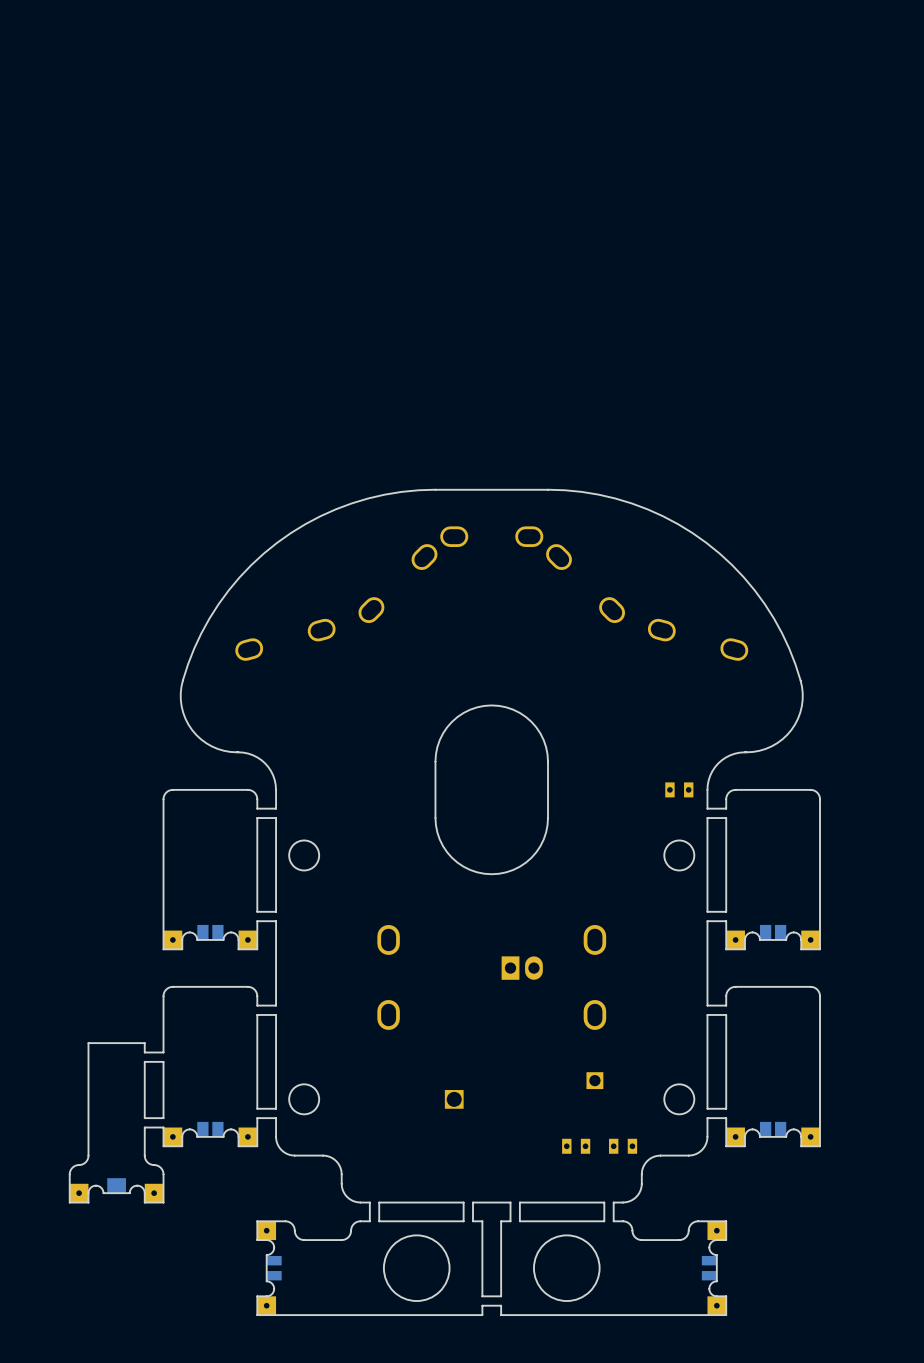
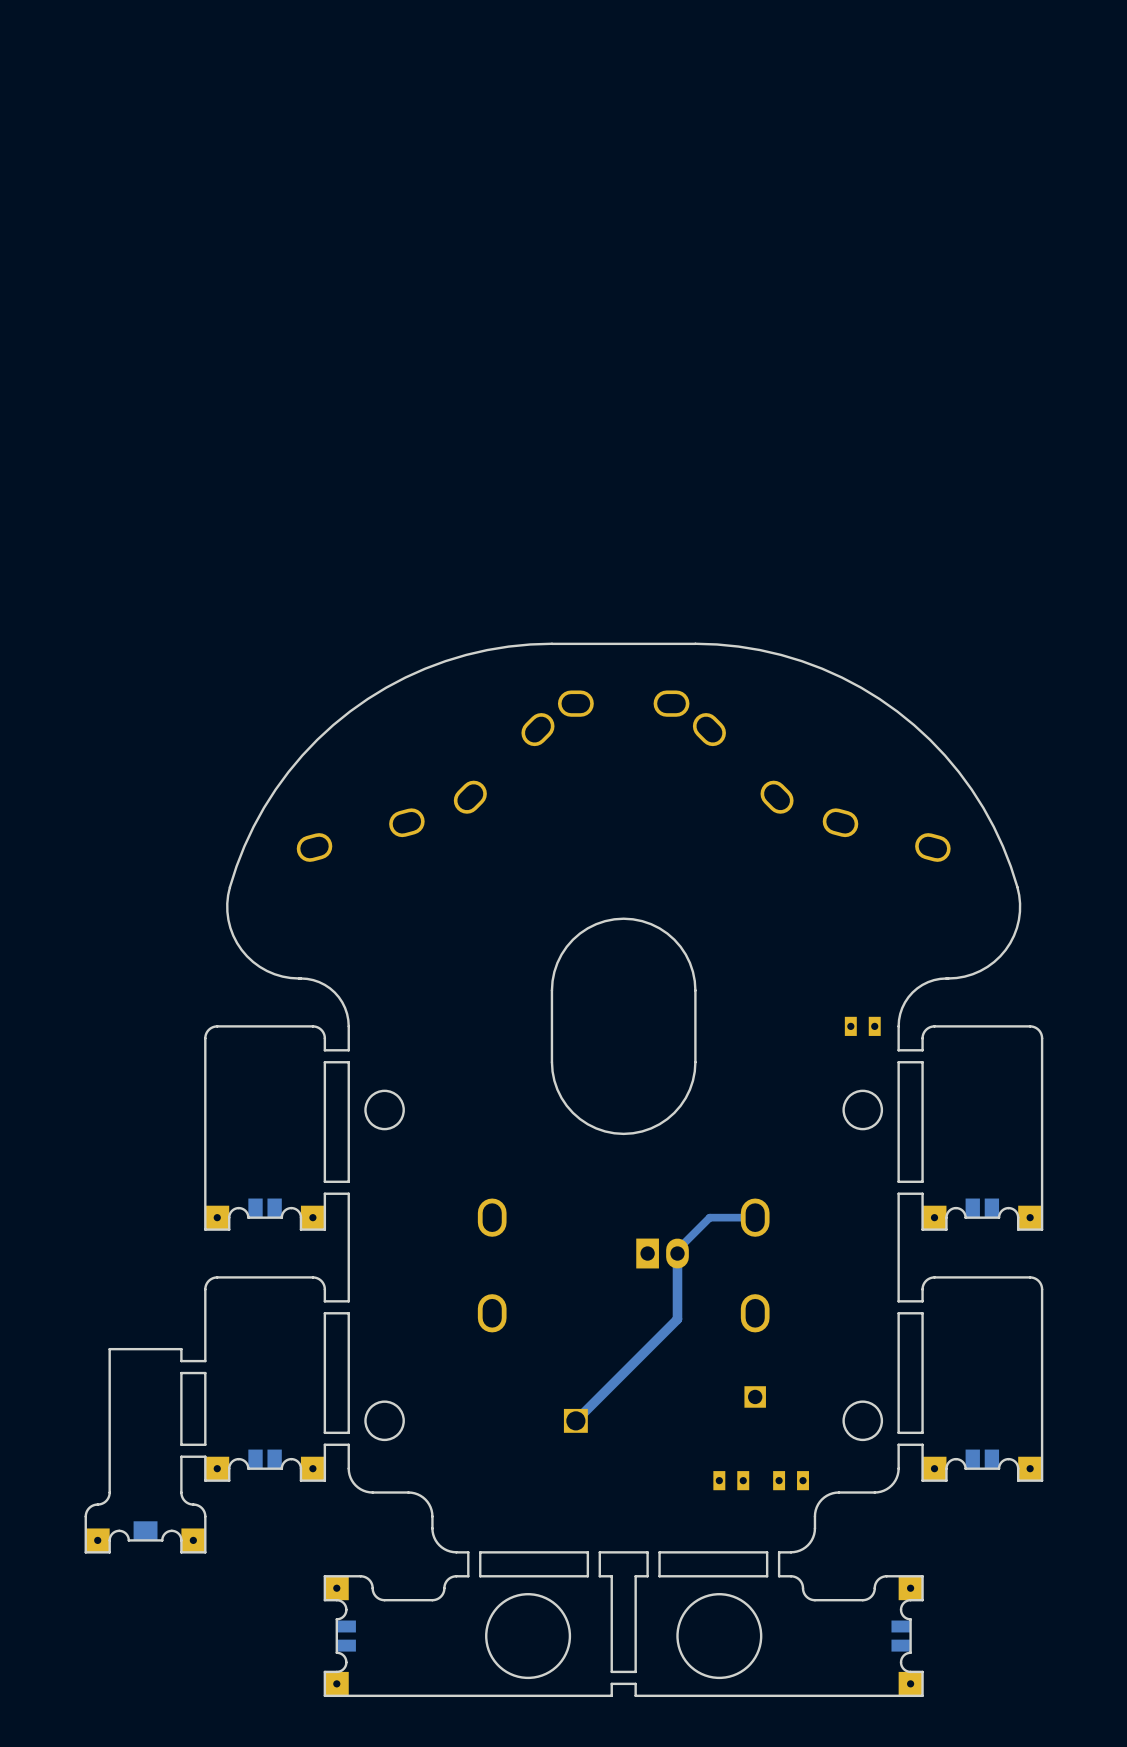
track: none -> (755, 1217) (709, 1217) (677, 1249) (677, 1319) (575, 1420)

